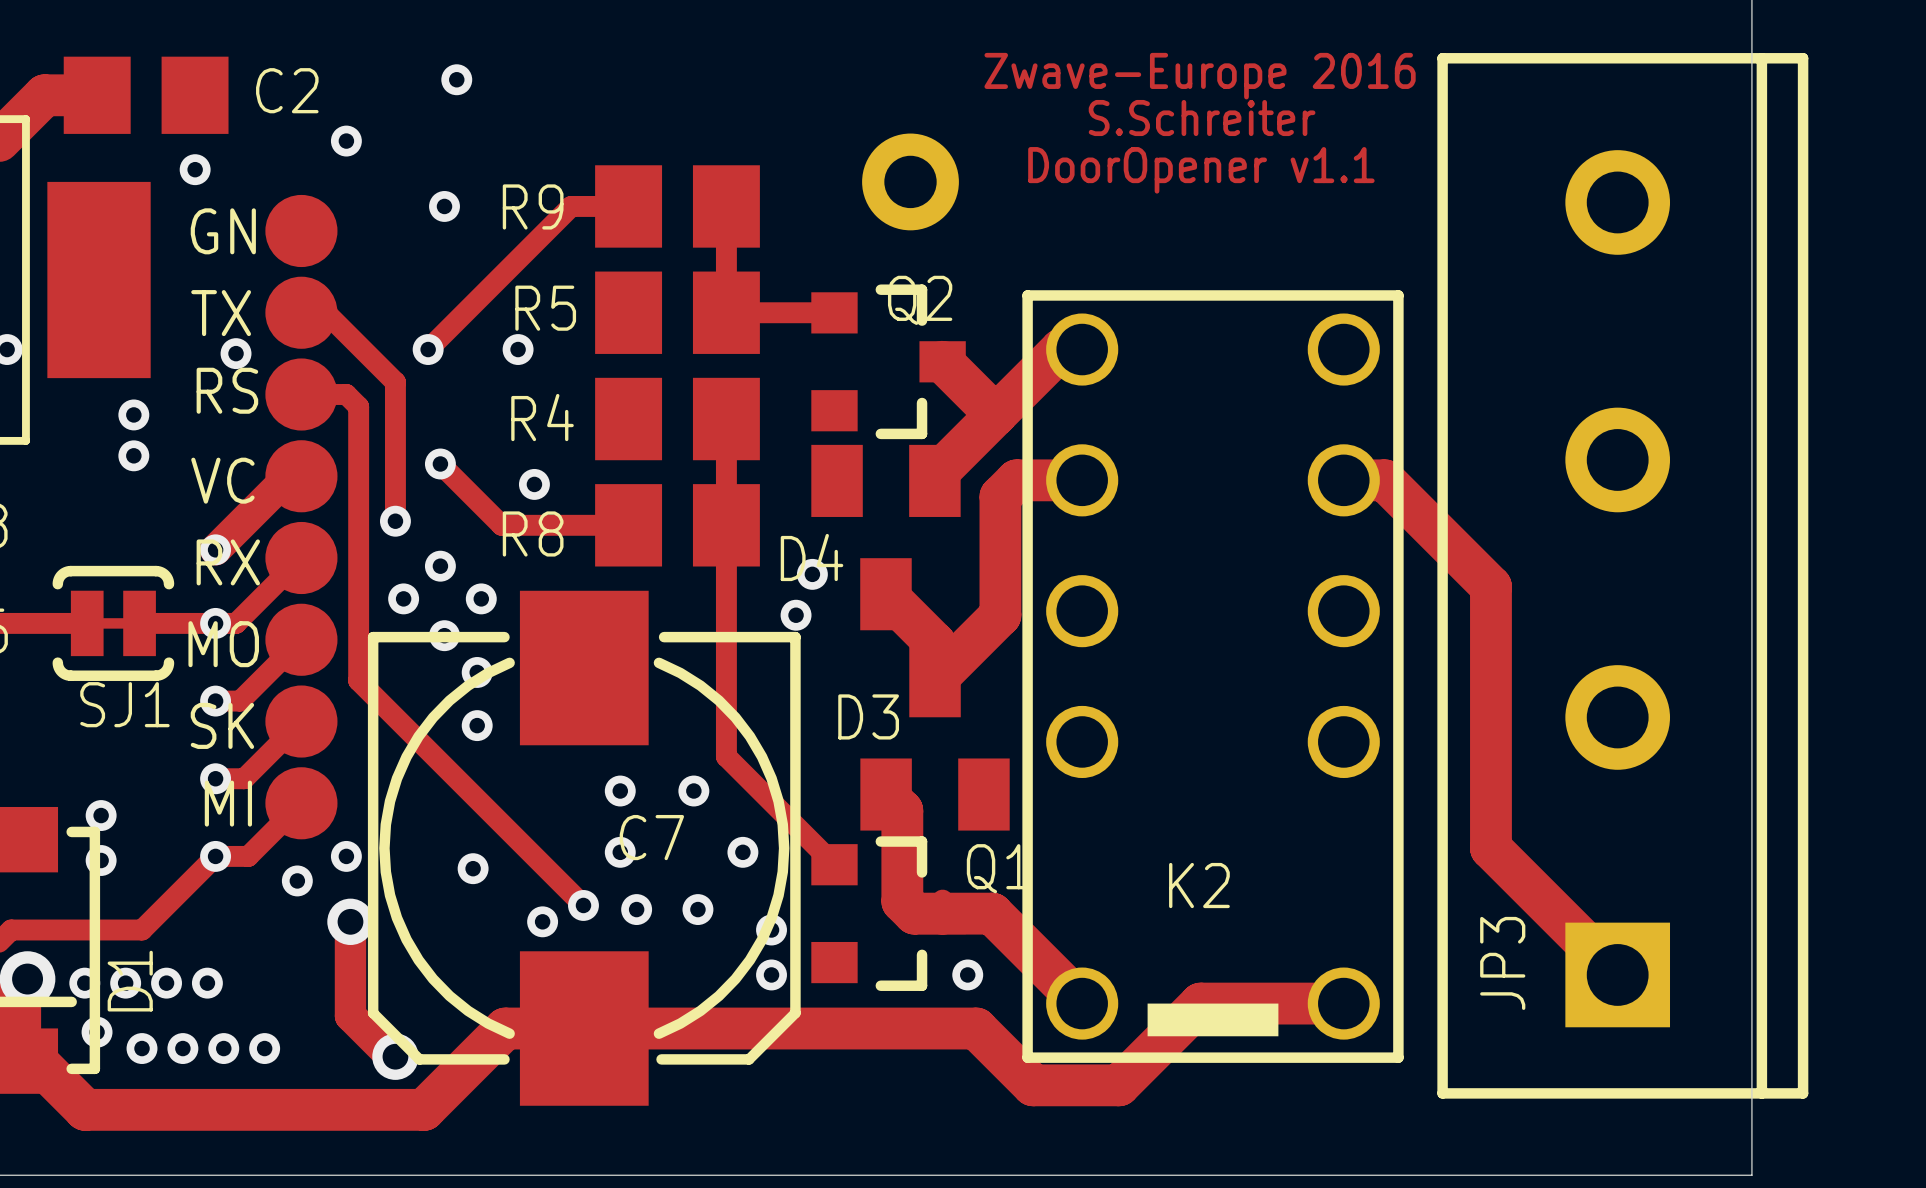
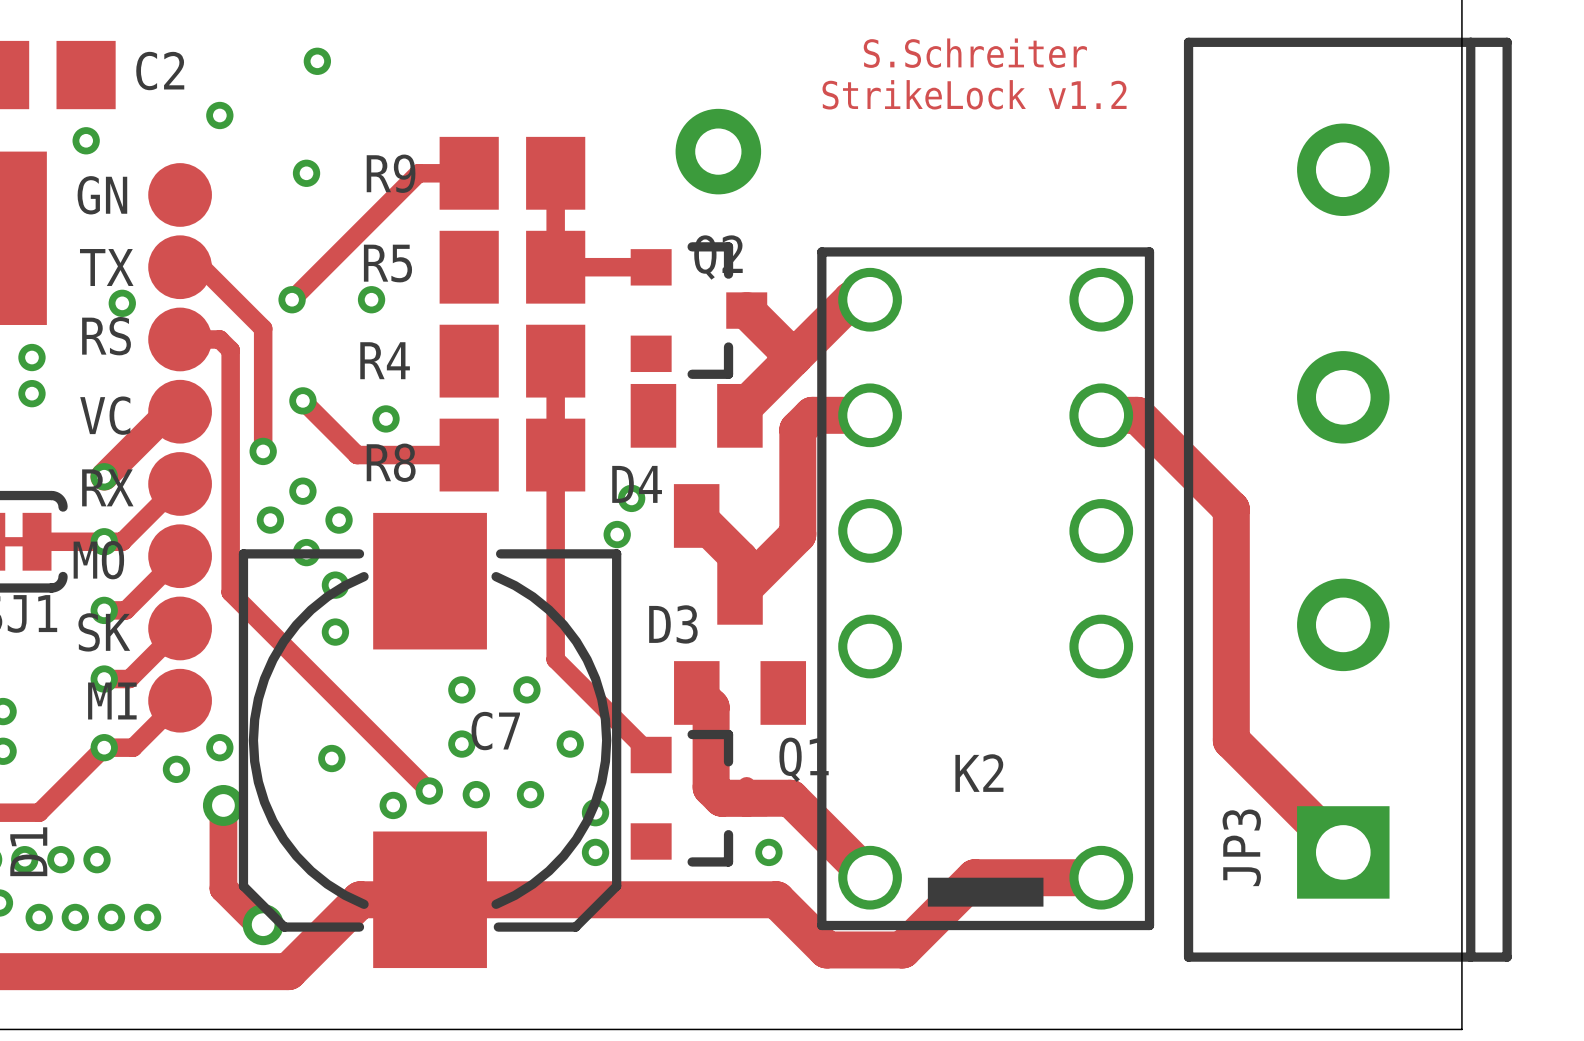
text: Zwave-Europe 2016 (1200, 76) -> none
text: none -> StrikeLock v1.2 (974, 94)
text position: S.Schreiter (1202, 118) -> S.Schreiter (975, 53)
text: DoorOpener v1.1 (1201, 170) -> none

